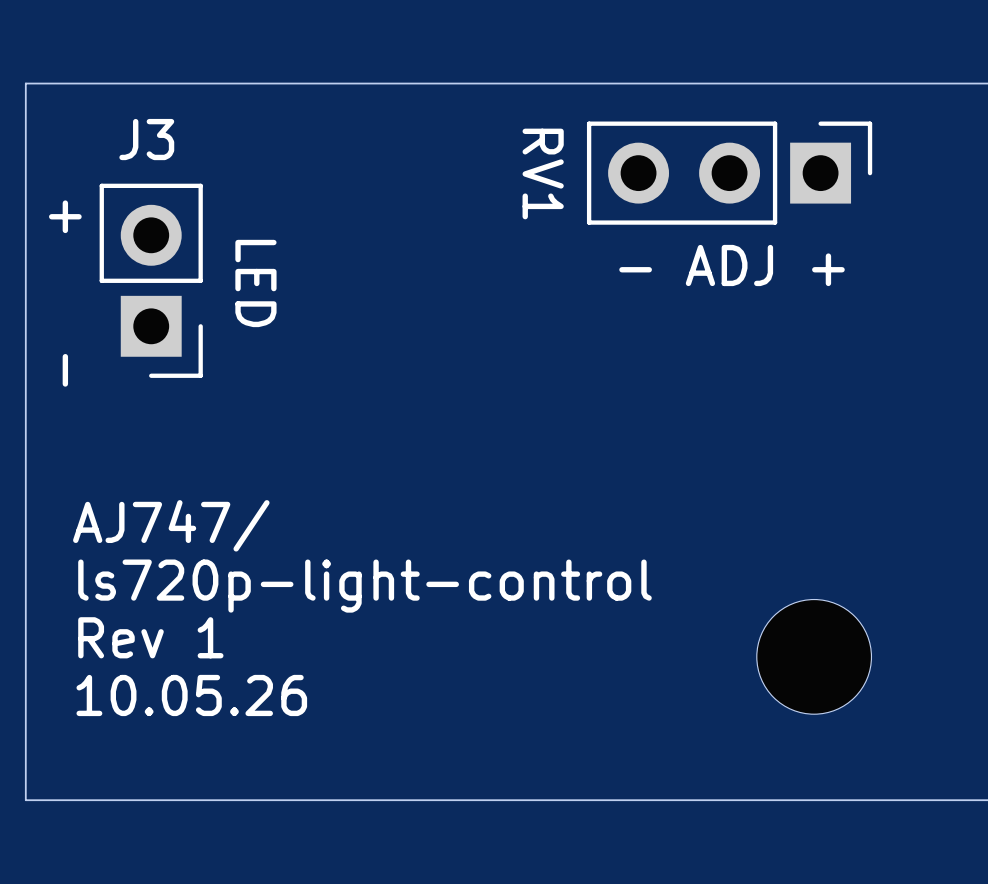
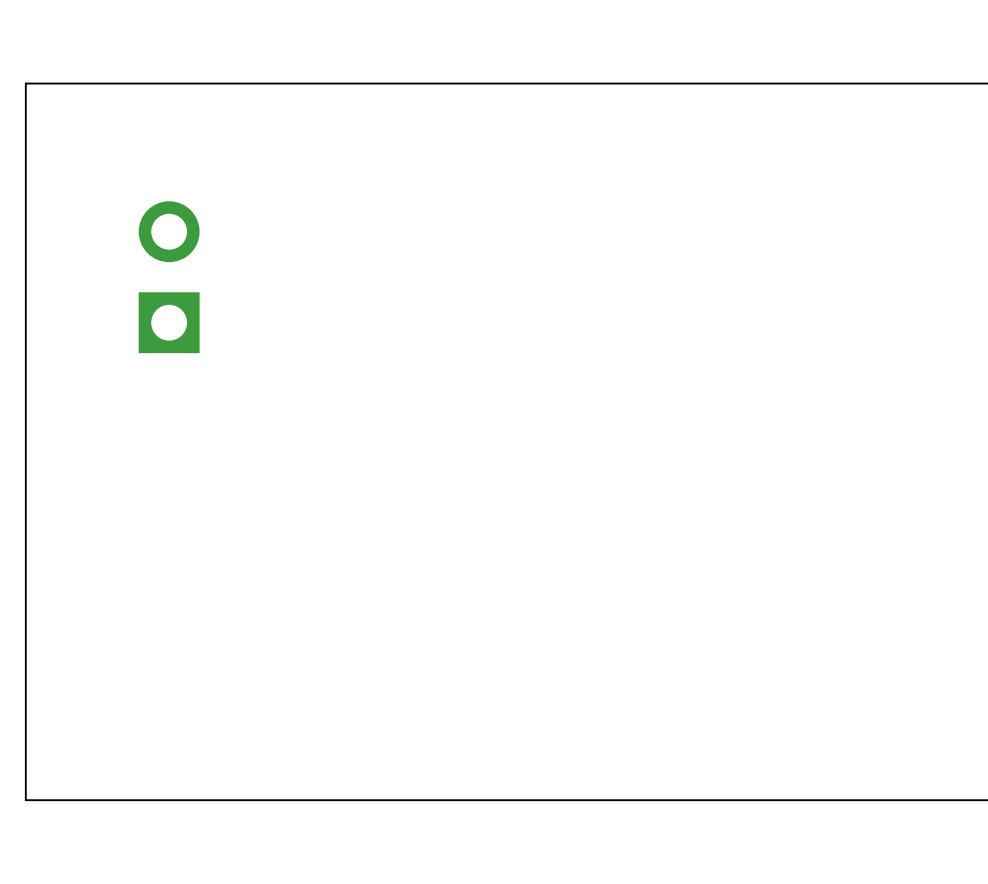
RV1: (729, 173) -> none
text: - ADJ + (732, 265) -> none
J3 side: bottom (151, 280) -> top (169, 277)
text: LED (255, 283) -> none
text: + - (65, 293) -> none
text: AJ747/ (171, 525) -> none
text: ls720p-light-control (364, 586) -> none
text: Rev 1 (150, 637) -> none
part: (814, 656) -> none
text: 10.05.26 (191, 695) -> none

